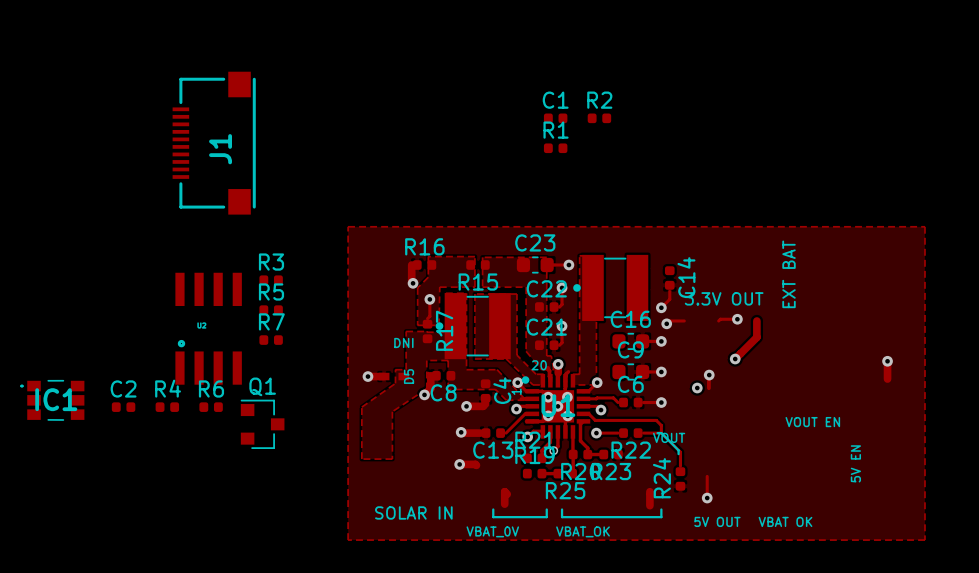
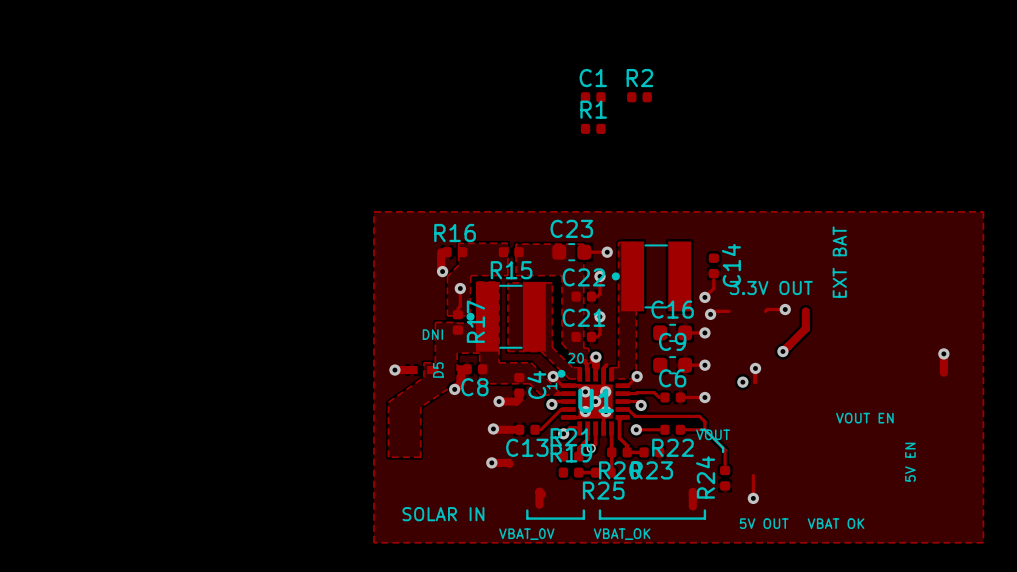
J1: (214, 143) -> none
R3: (271, 280) -> none
R5: (271, 310) -> none
part: (208, 328) -> none
R7: (271, 340) -> none
IC1: (52, 400) -> none
C2: (123, 407) -> none
R4: (167, 407) -> none
R6: (211, 407) -> none
Q1: (262, 424) -> none

